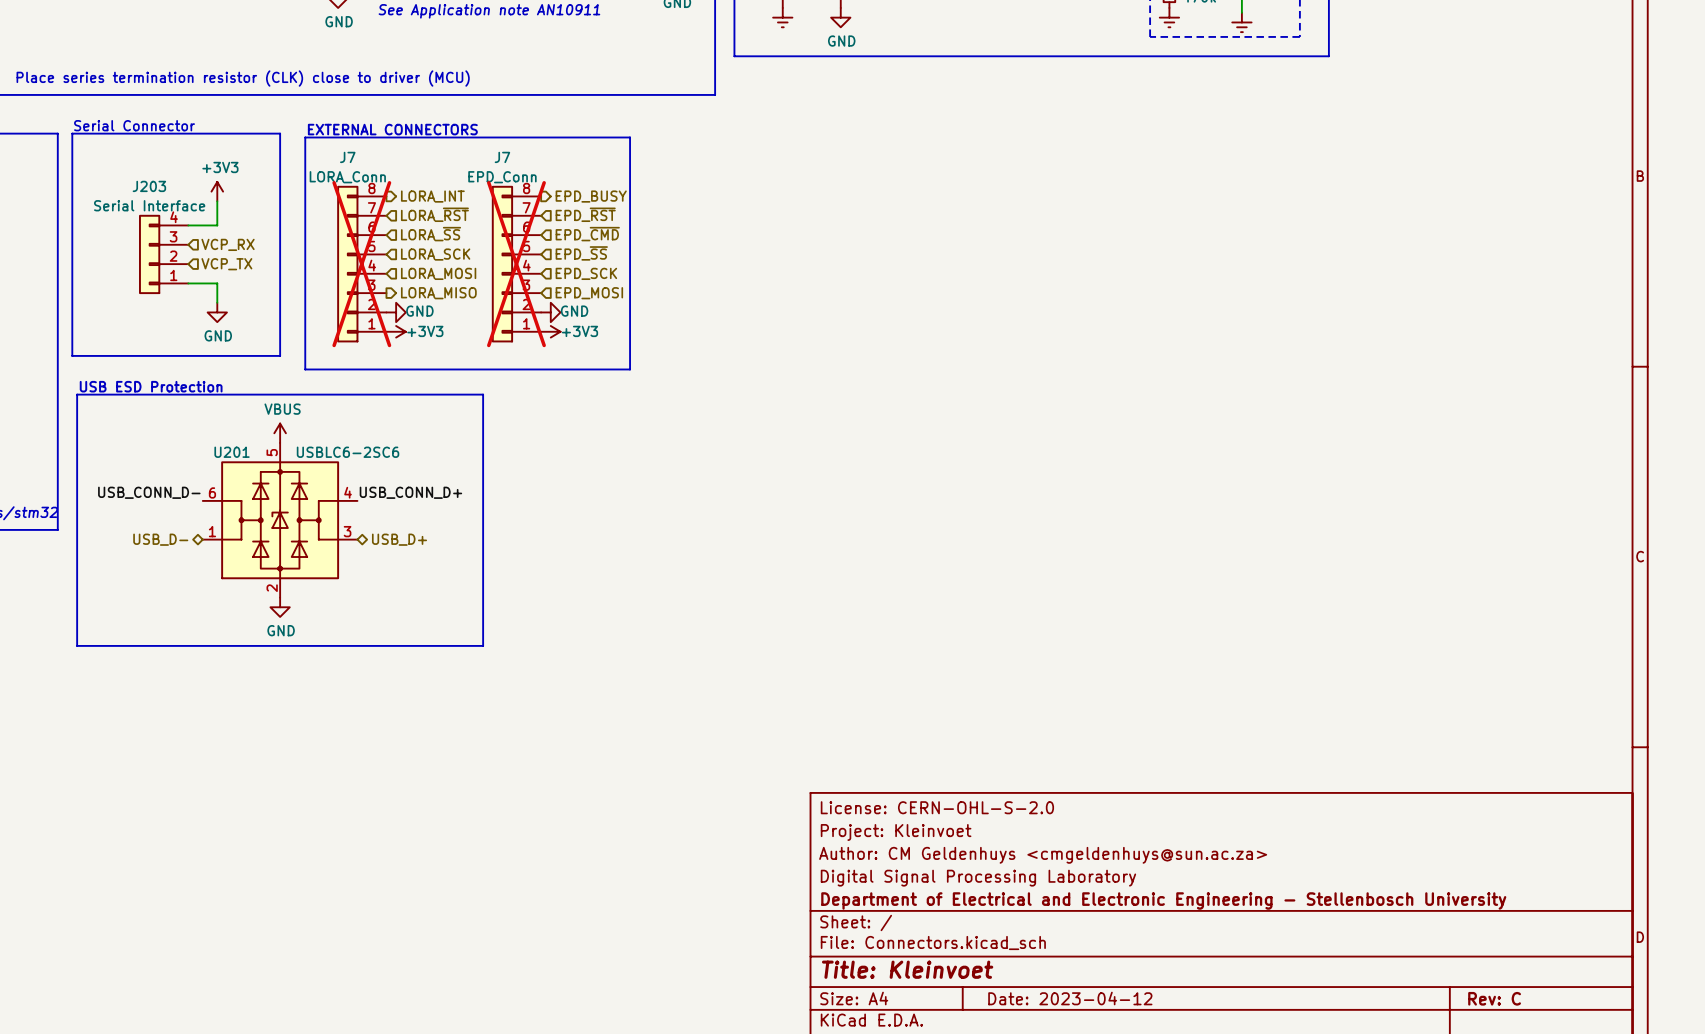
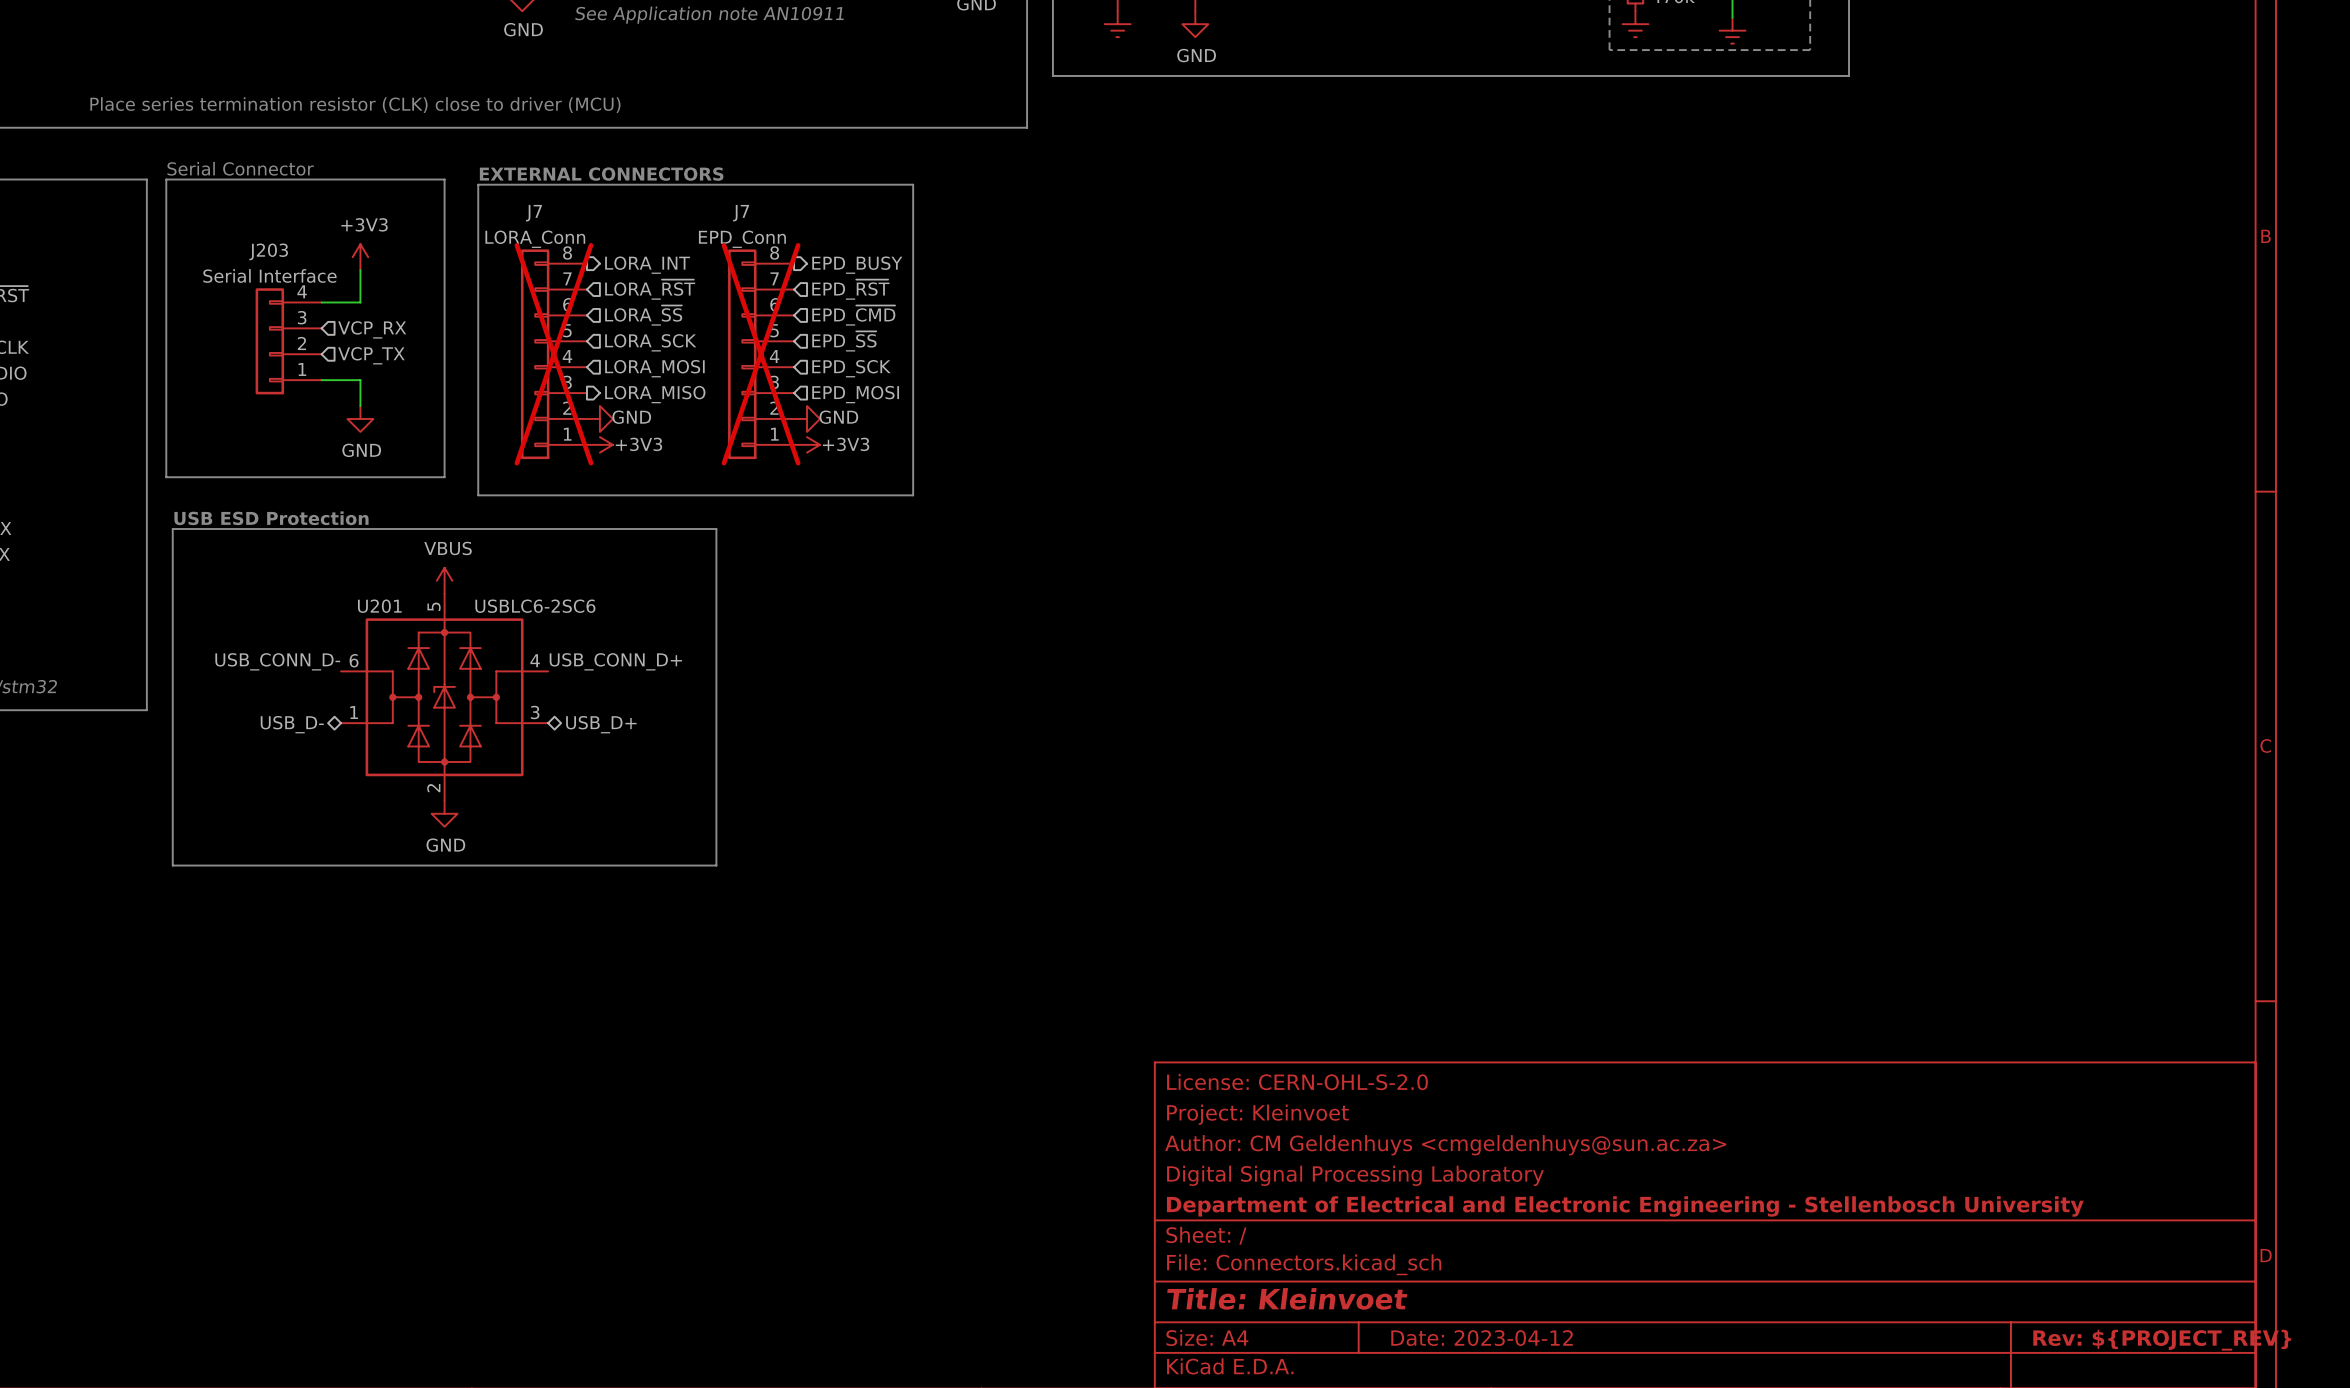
title block: Rev: C (1494, 998) -> Rev: ${PROJECT_REV} (2162, 1340)

